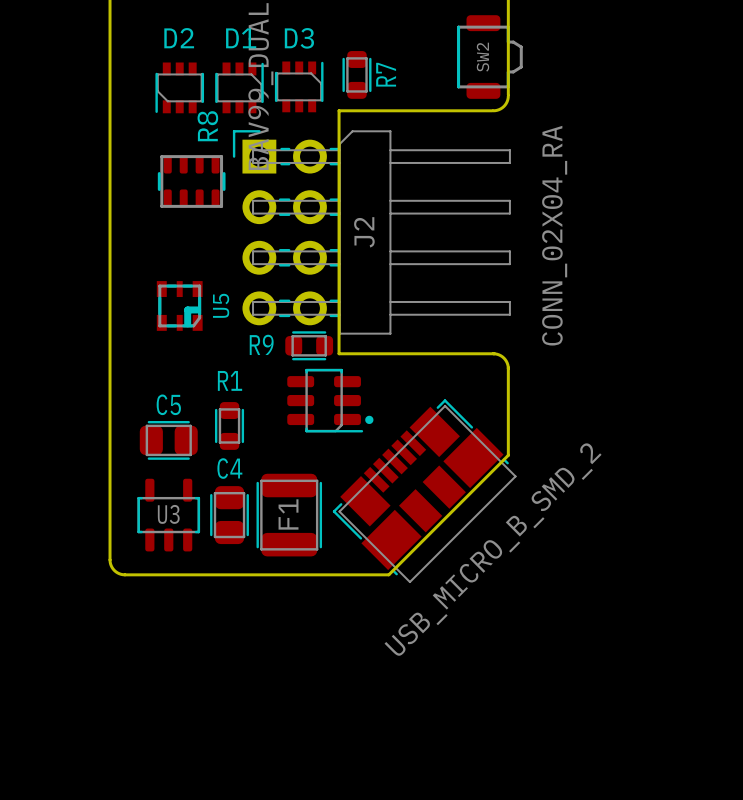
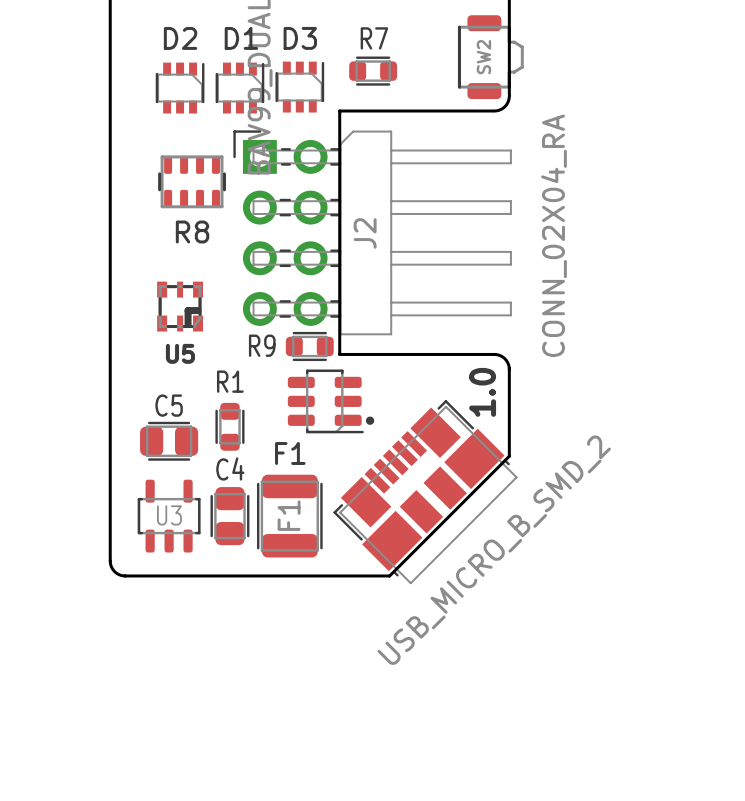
R7 rotation: 0° (356, 74) -> 90° clockwise (373, 71)
R7 name position: R7 (386, 74) -> R7 (374, 38)
D2 rotation: 0° (179, 87) -> 180° (180, 88)
R8 name rotation: 0° (207, 126) -> 90° clockwise (192, 231)
R8 name position: R8 (207, 126) -> R8 (192, 231)
U5 name rotation: 0° (221, 305) -> 90° clockwise (180, 353)
U5 name position: U5 (221, 305) -> U5 (180, 353)
text: none -> 1.0 (482, 392)
F1 value: none -> F1 (290, 453)

